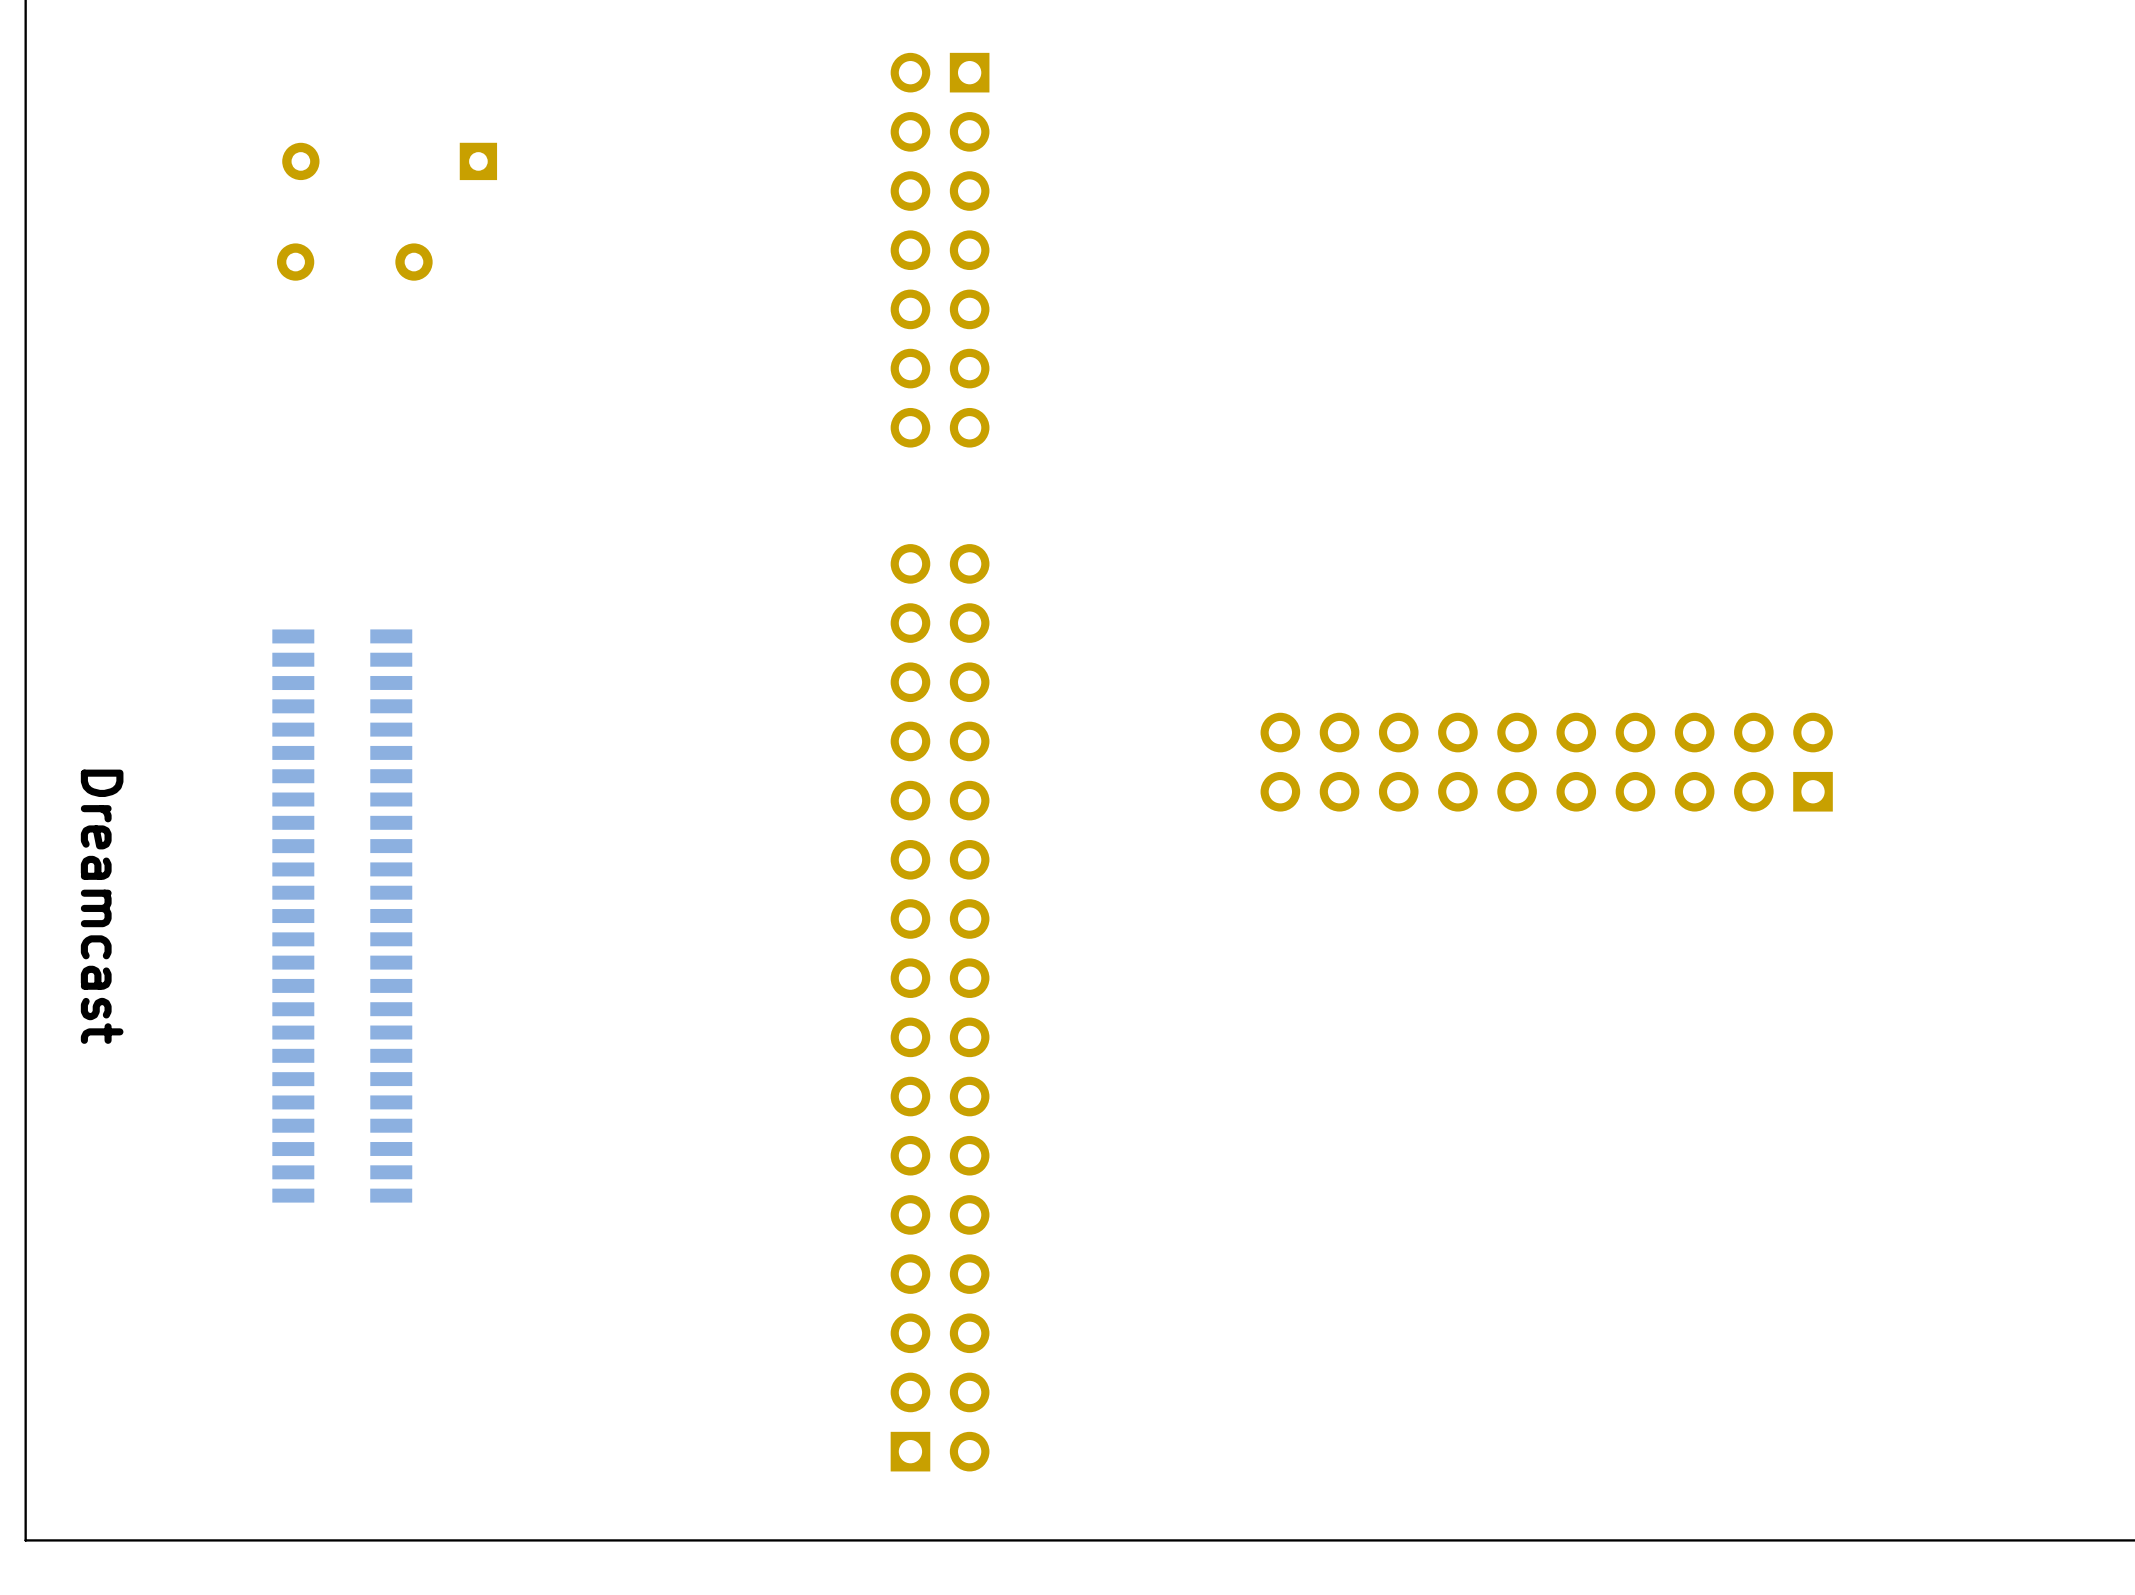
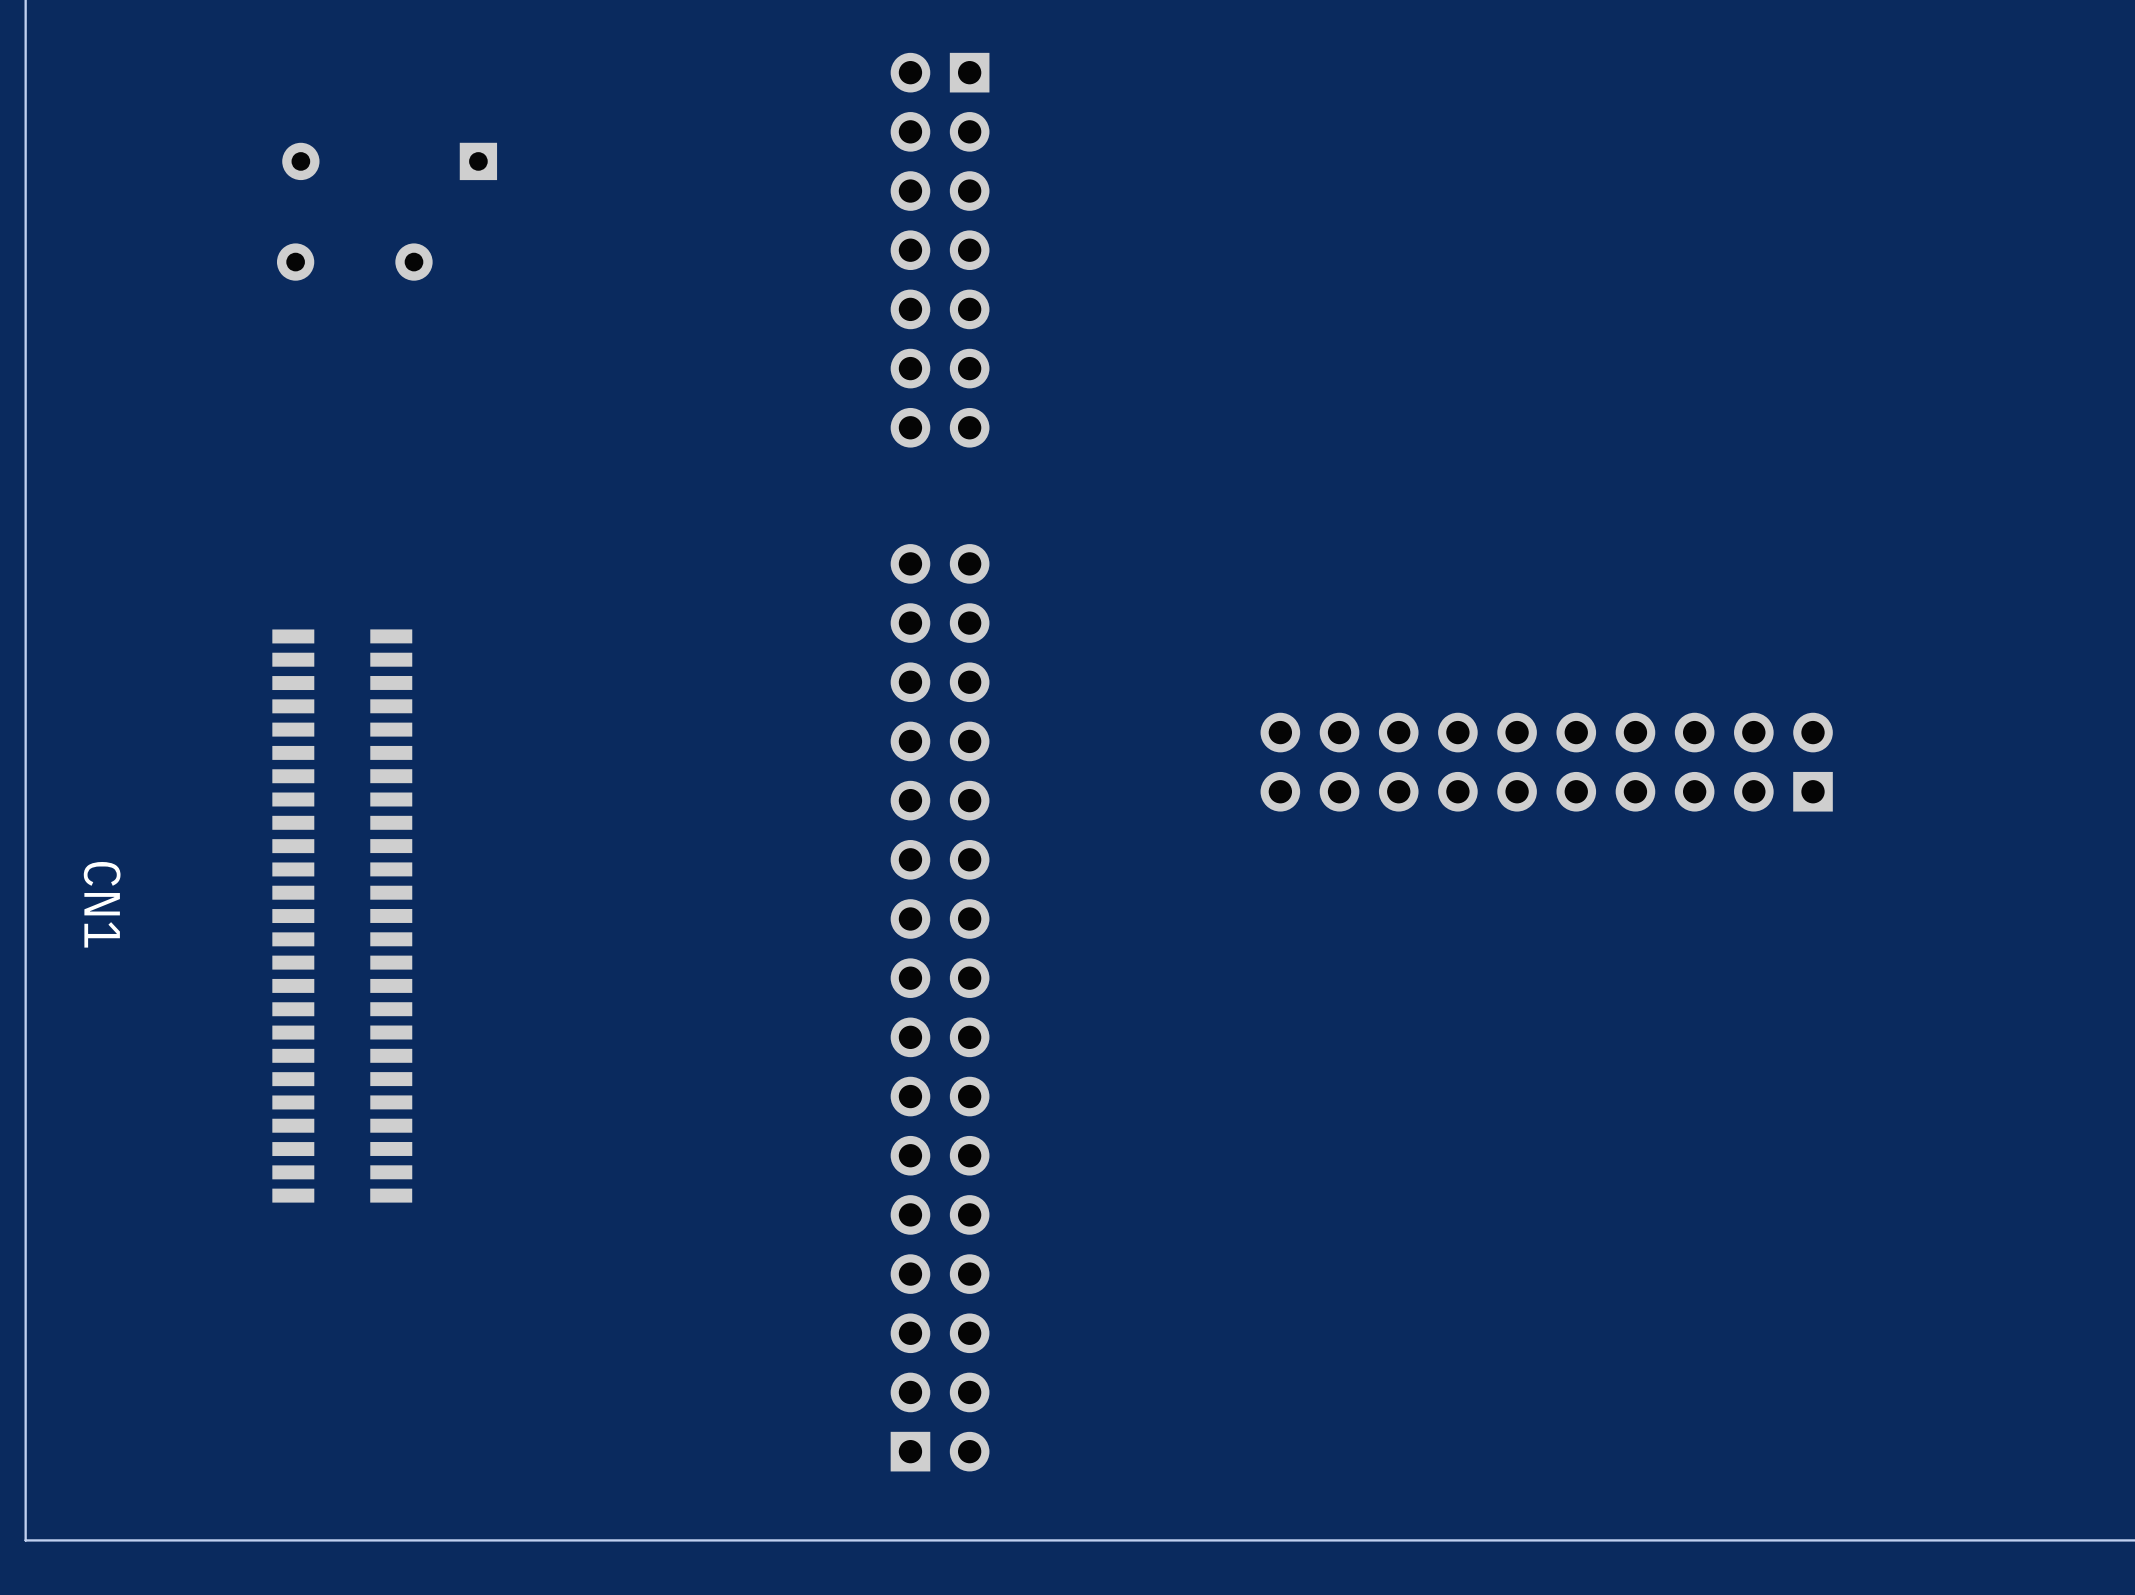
Dreamcast name: Dreamcast (102, 906) -> CN1 (102, 904)

